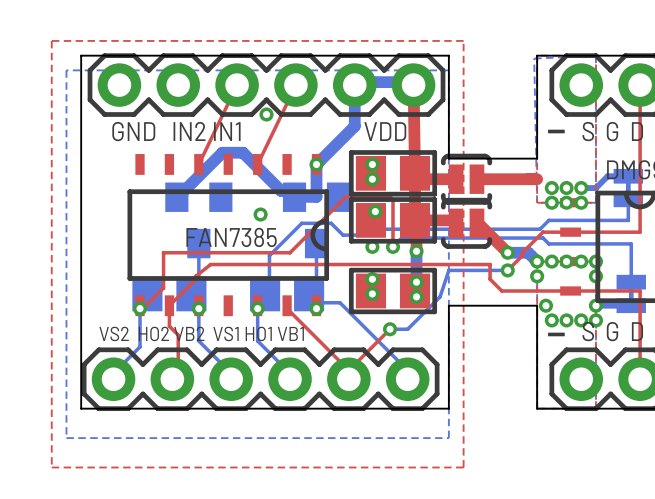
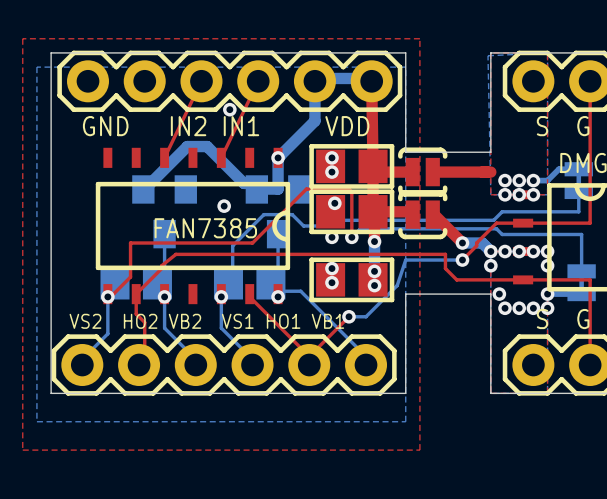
text: - (556, 131) -> none
text: - (556, 334) -> none

